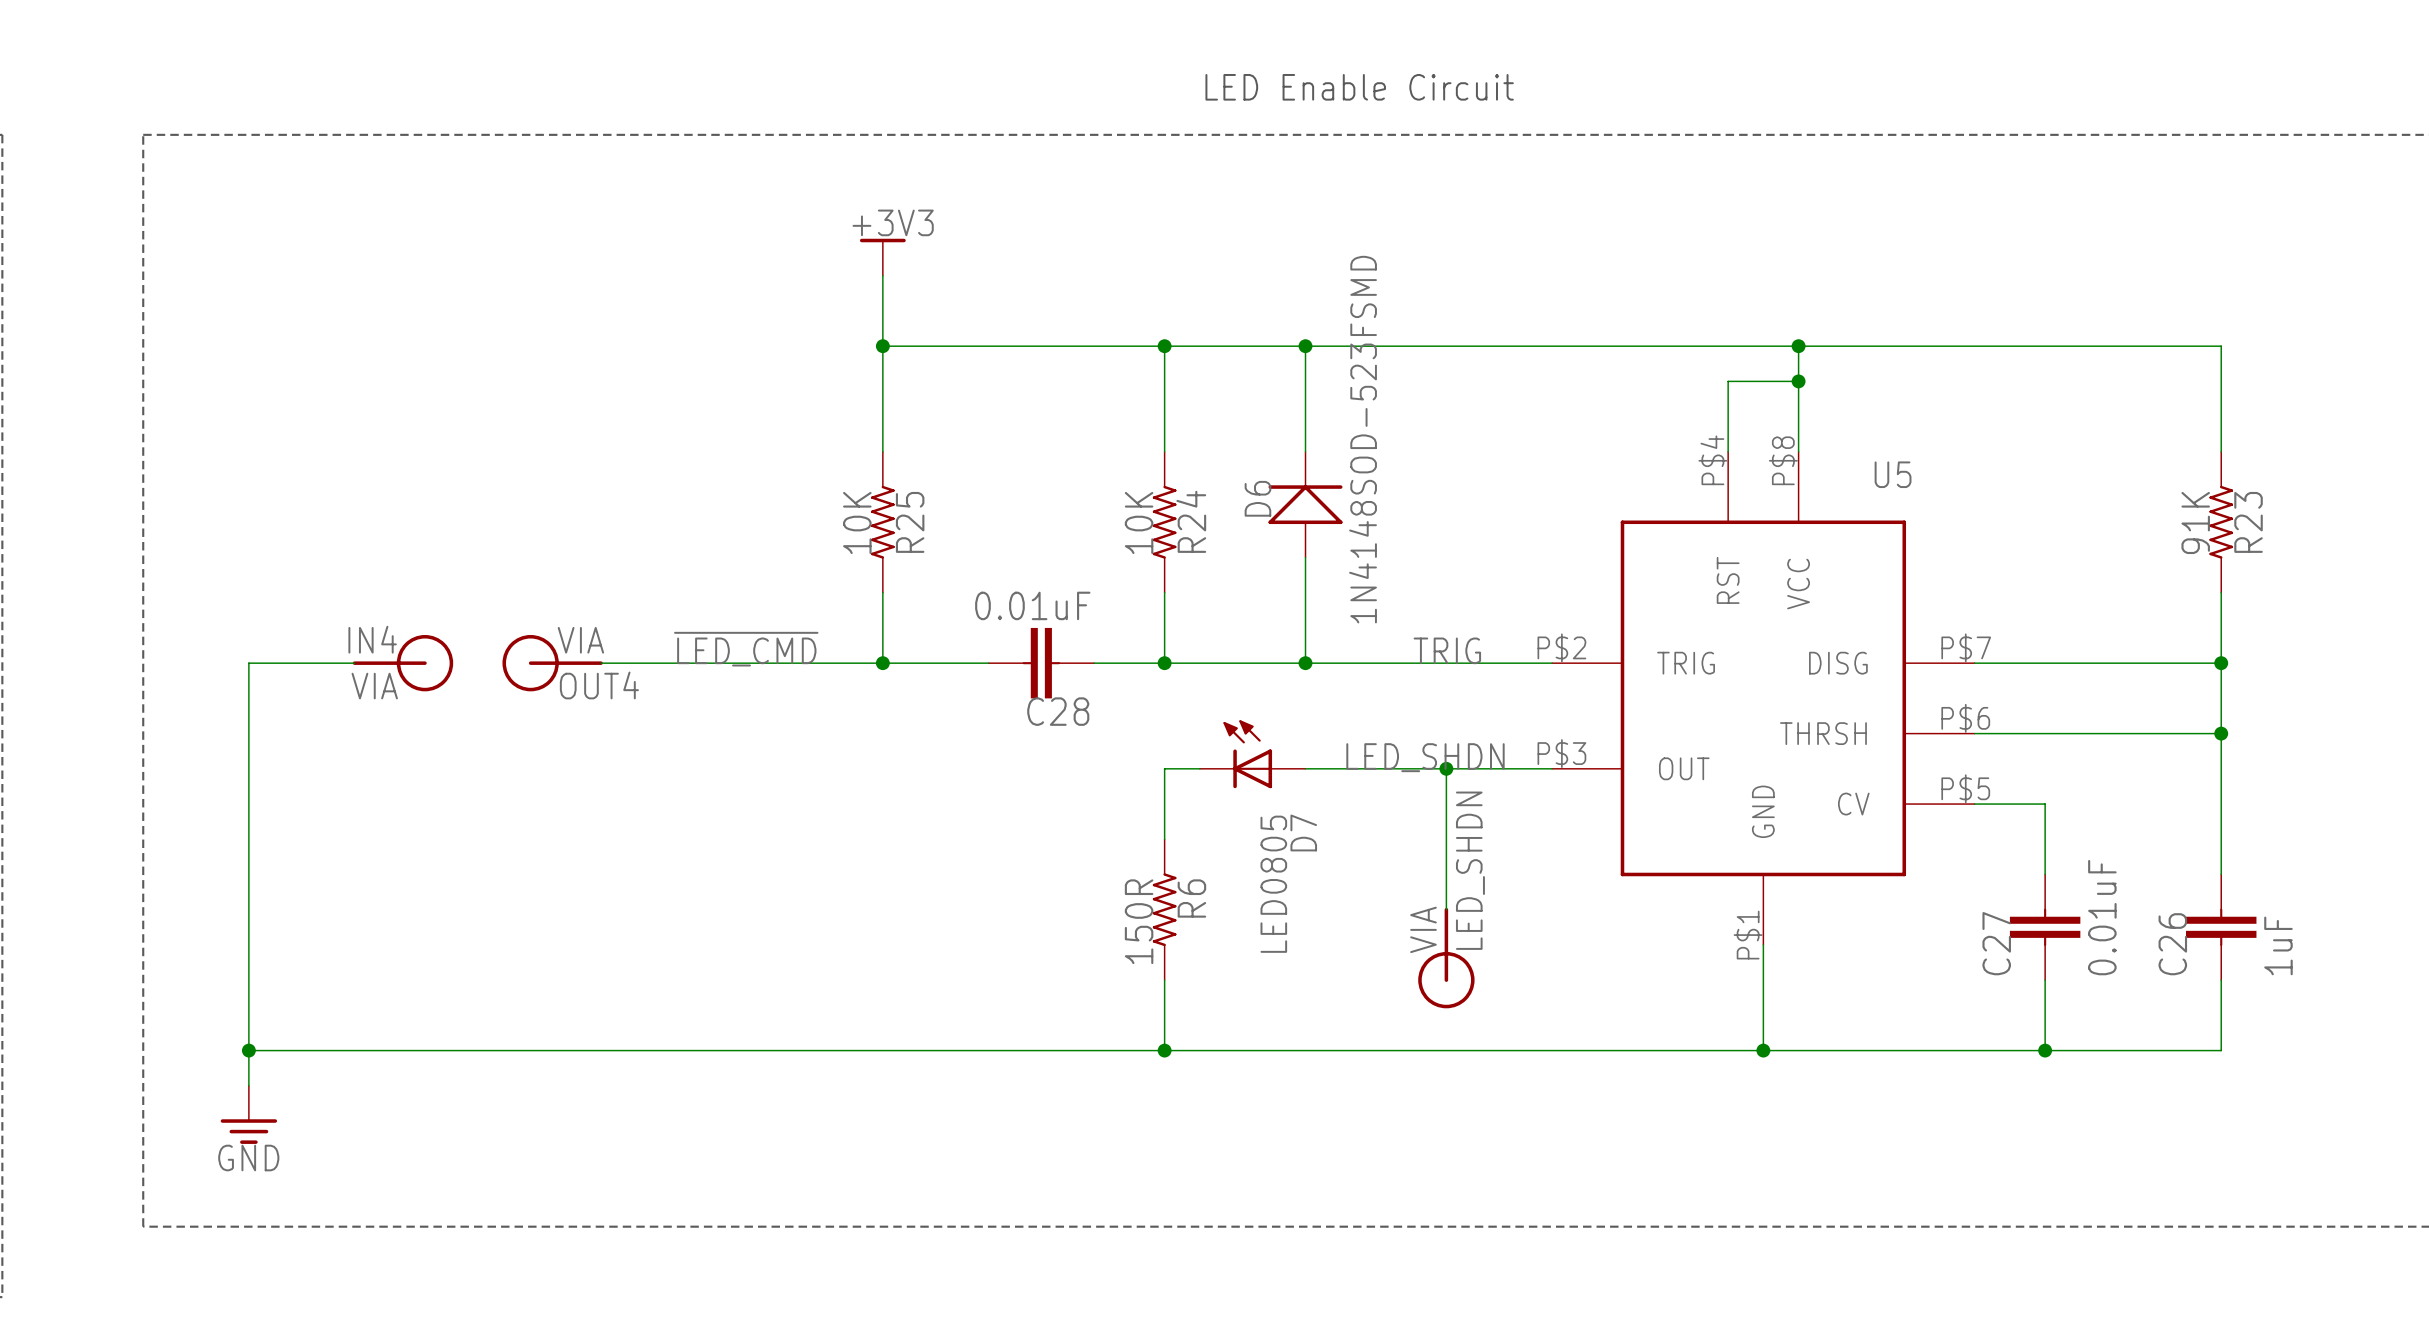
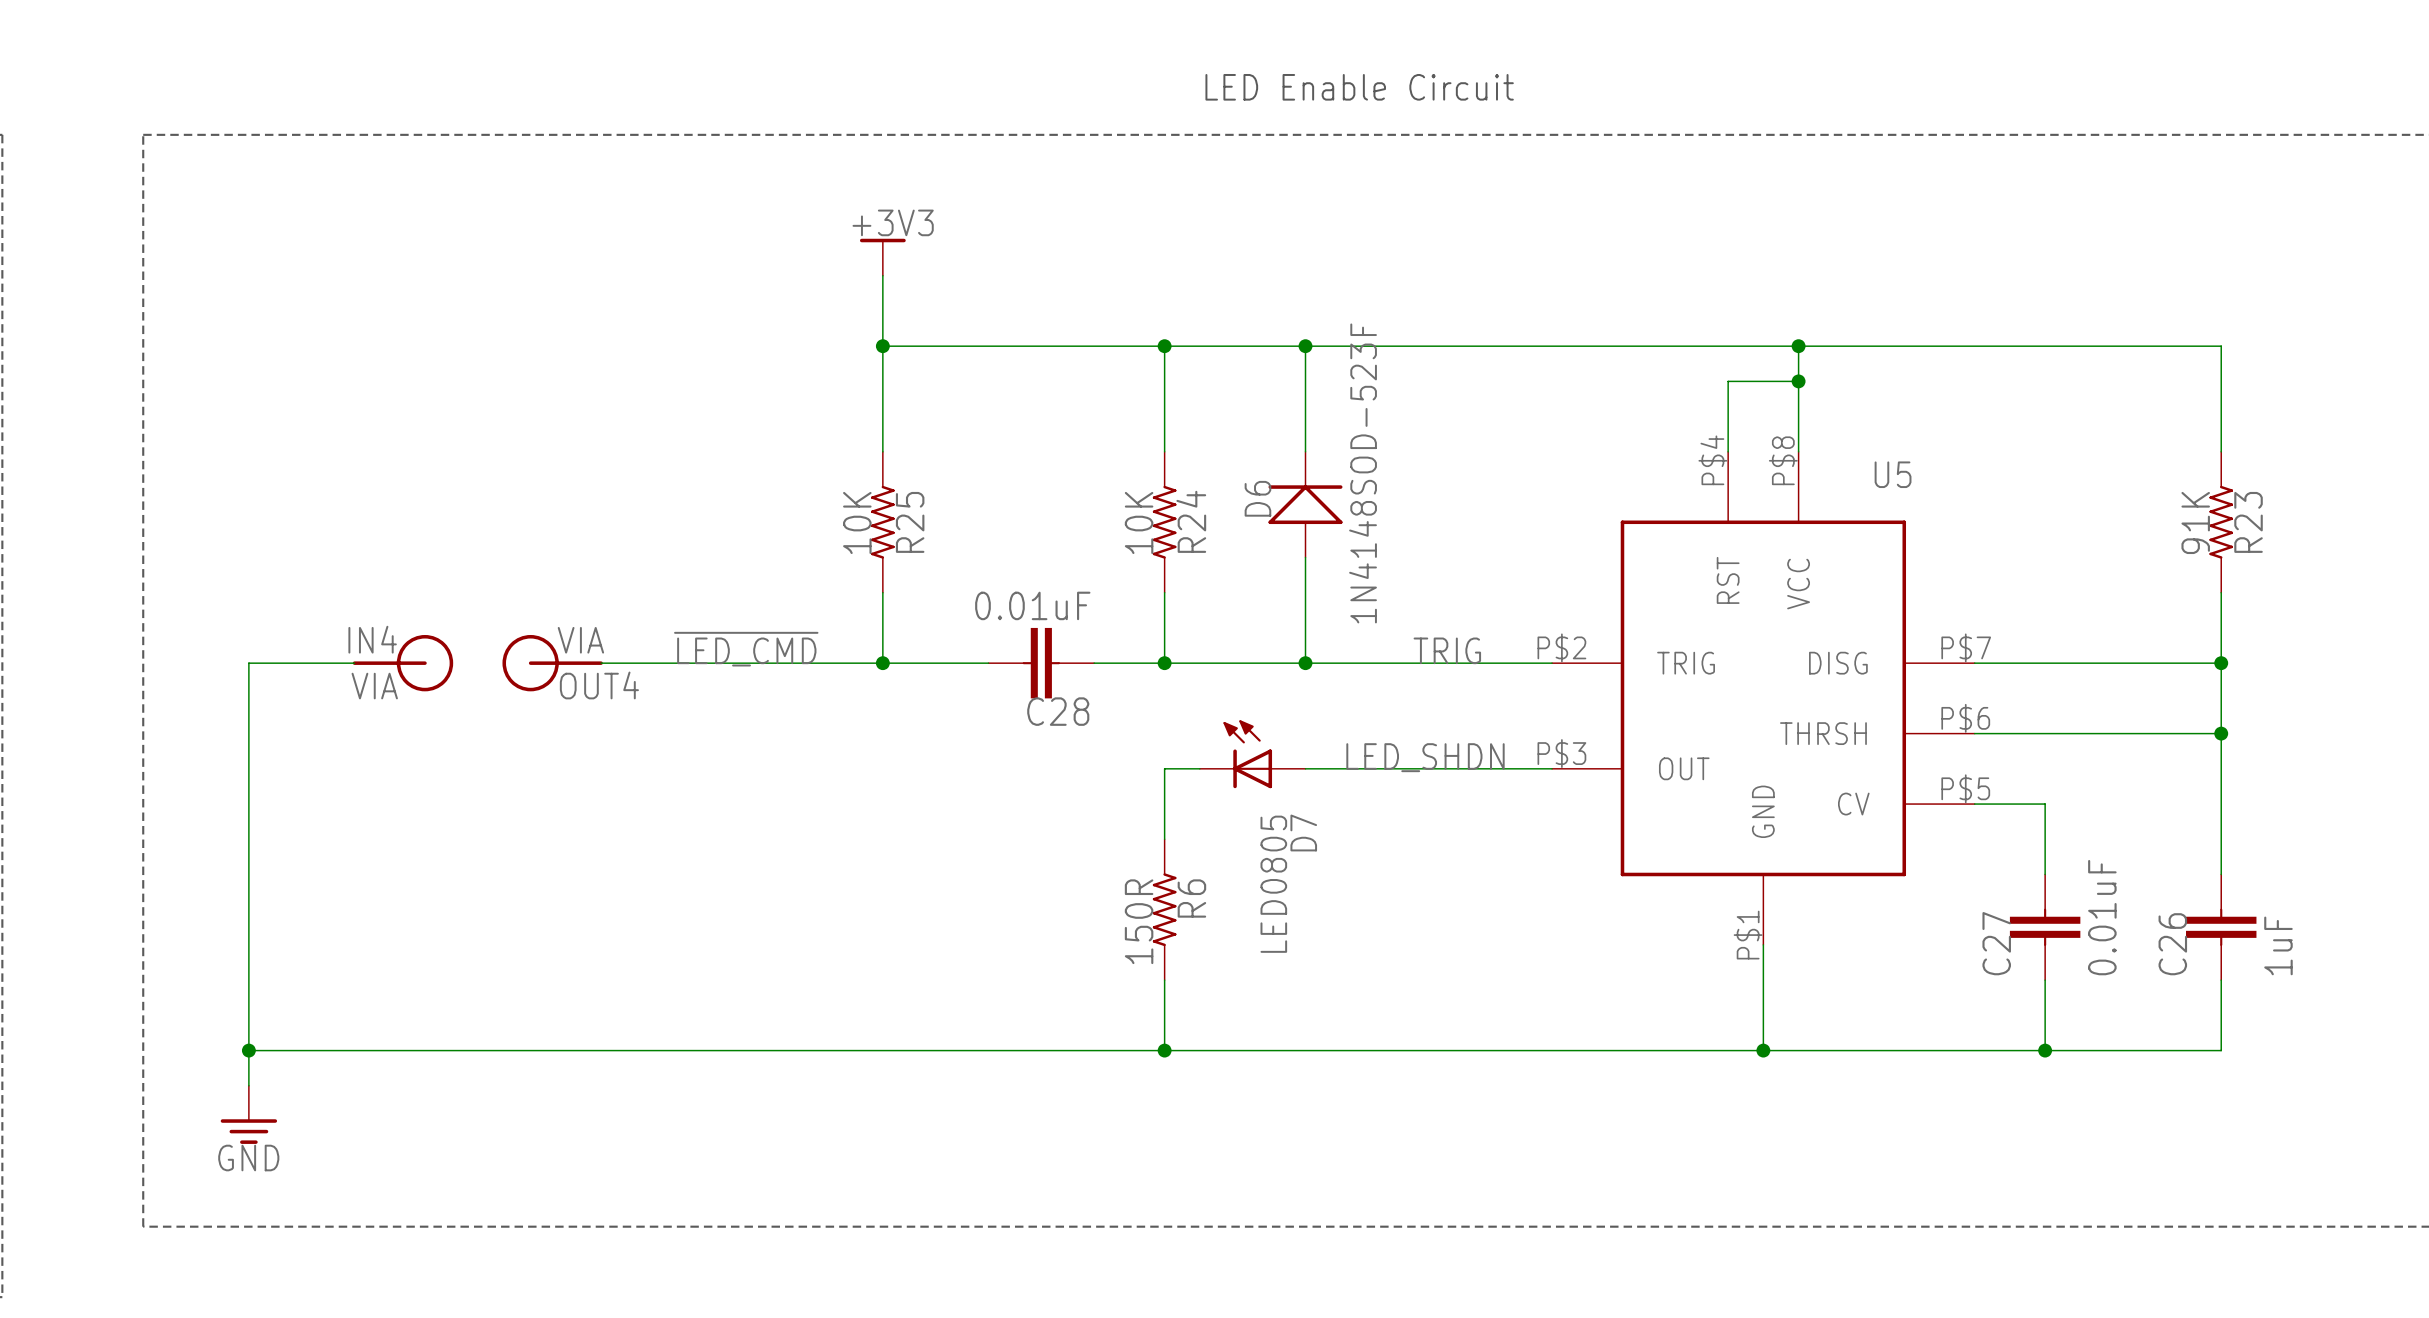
D6 value: 1N4148SOD-523FSMD (1363, 439) -> 1N4148SOD-523F (1363, 473)
wire: (1446, 768) (1446, 909) -> none
junction: (1446, 768) -> none
part: LED_SHDN (1446, 958) -> none

